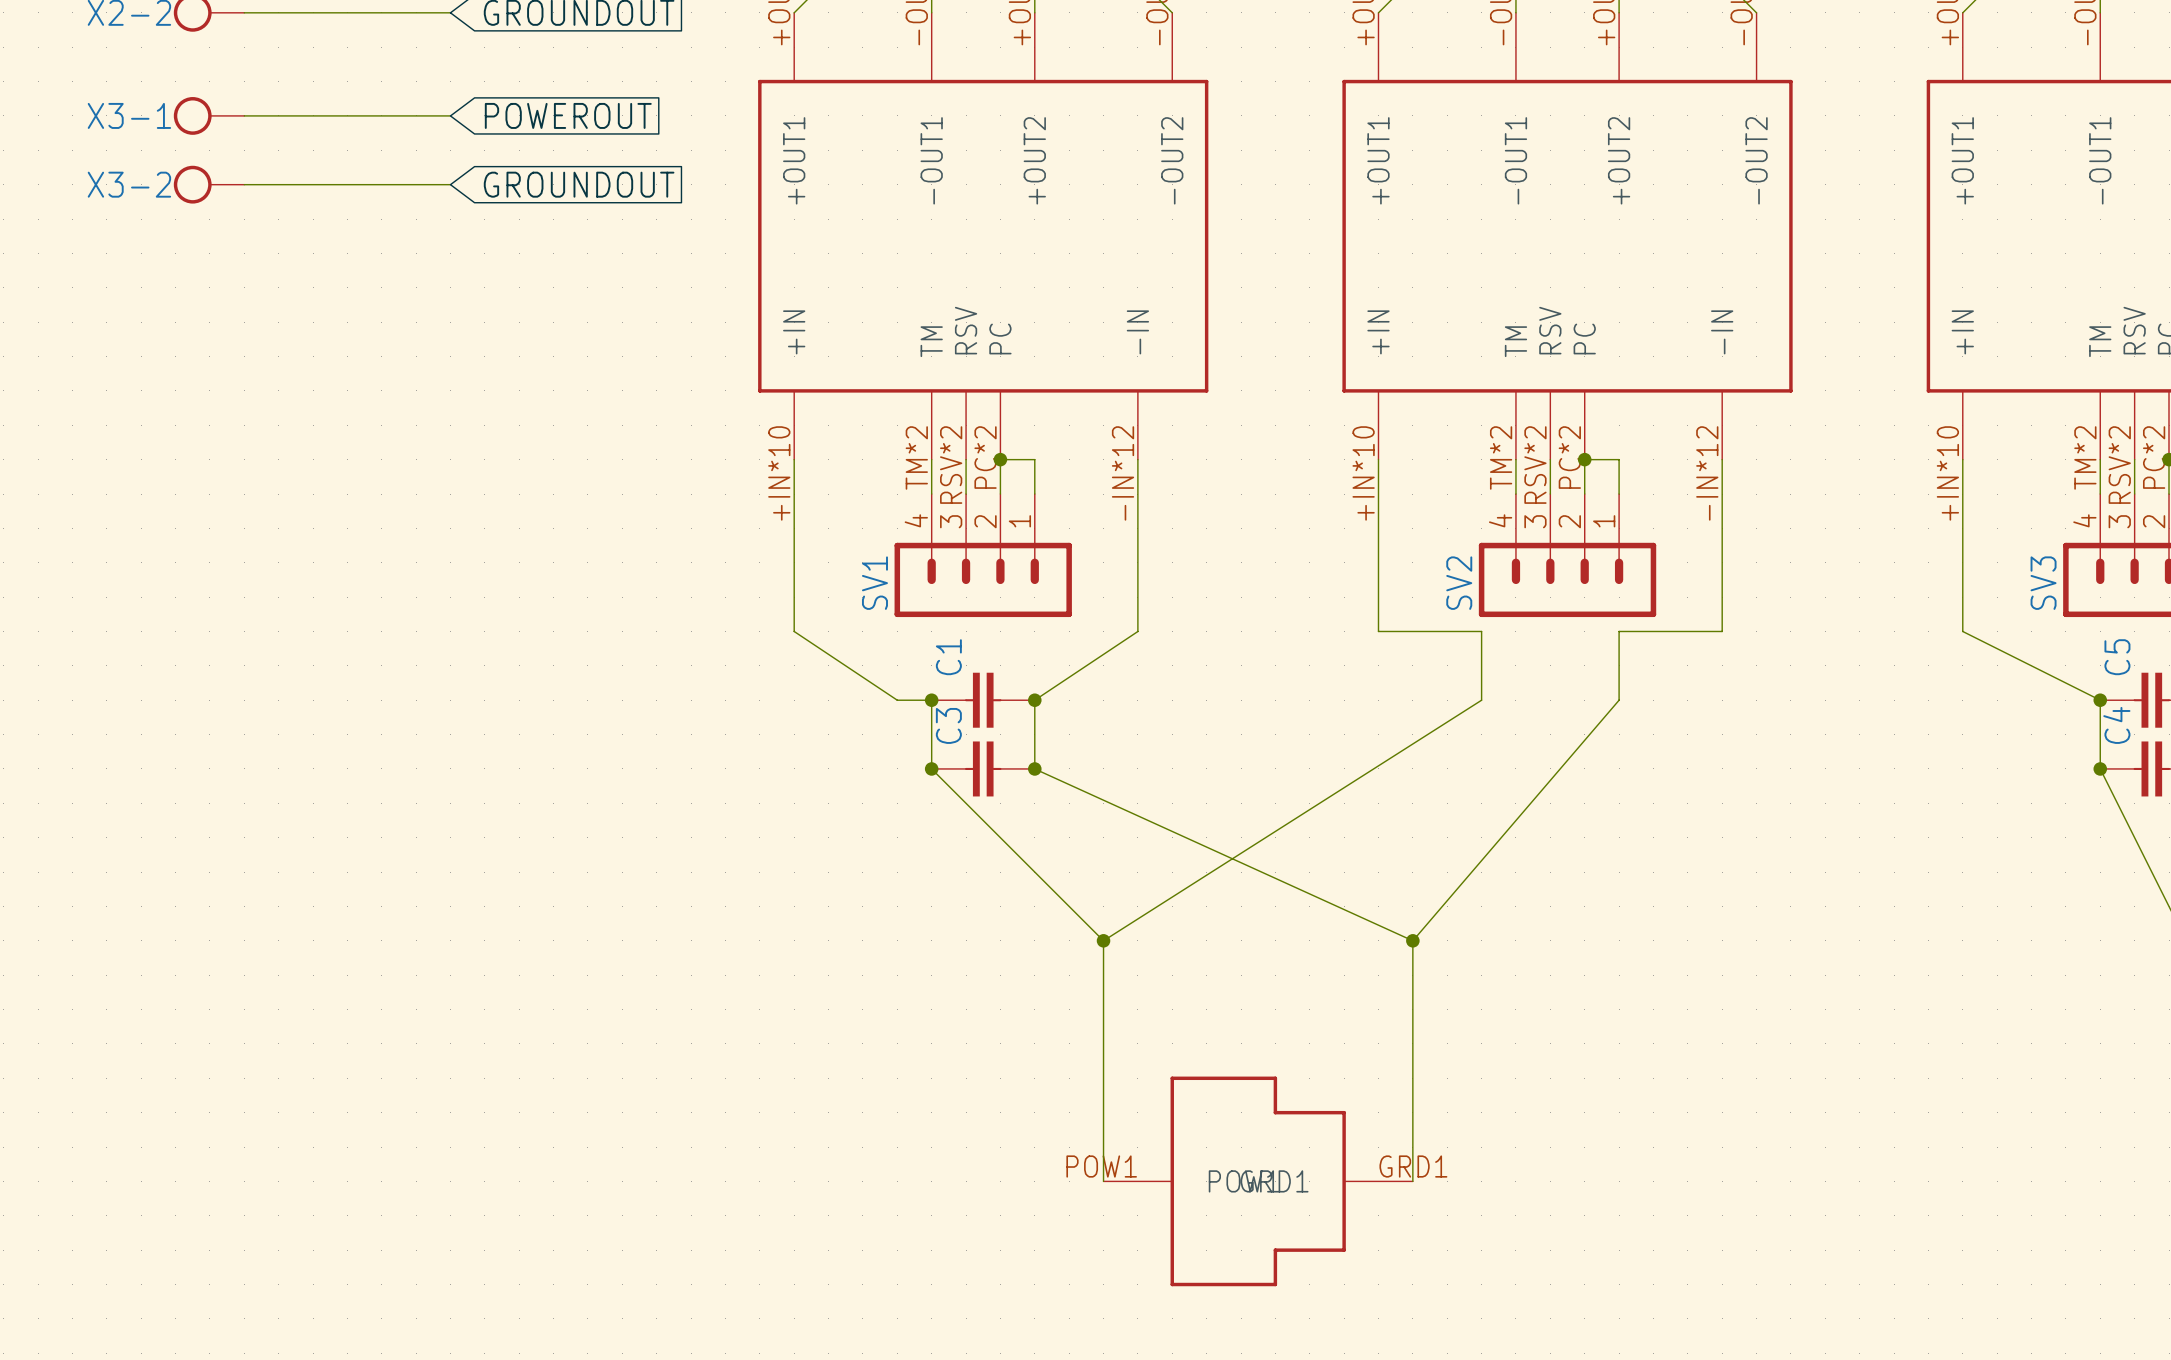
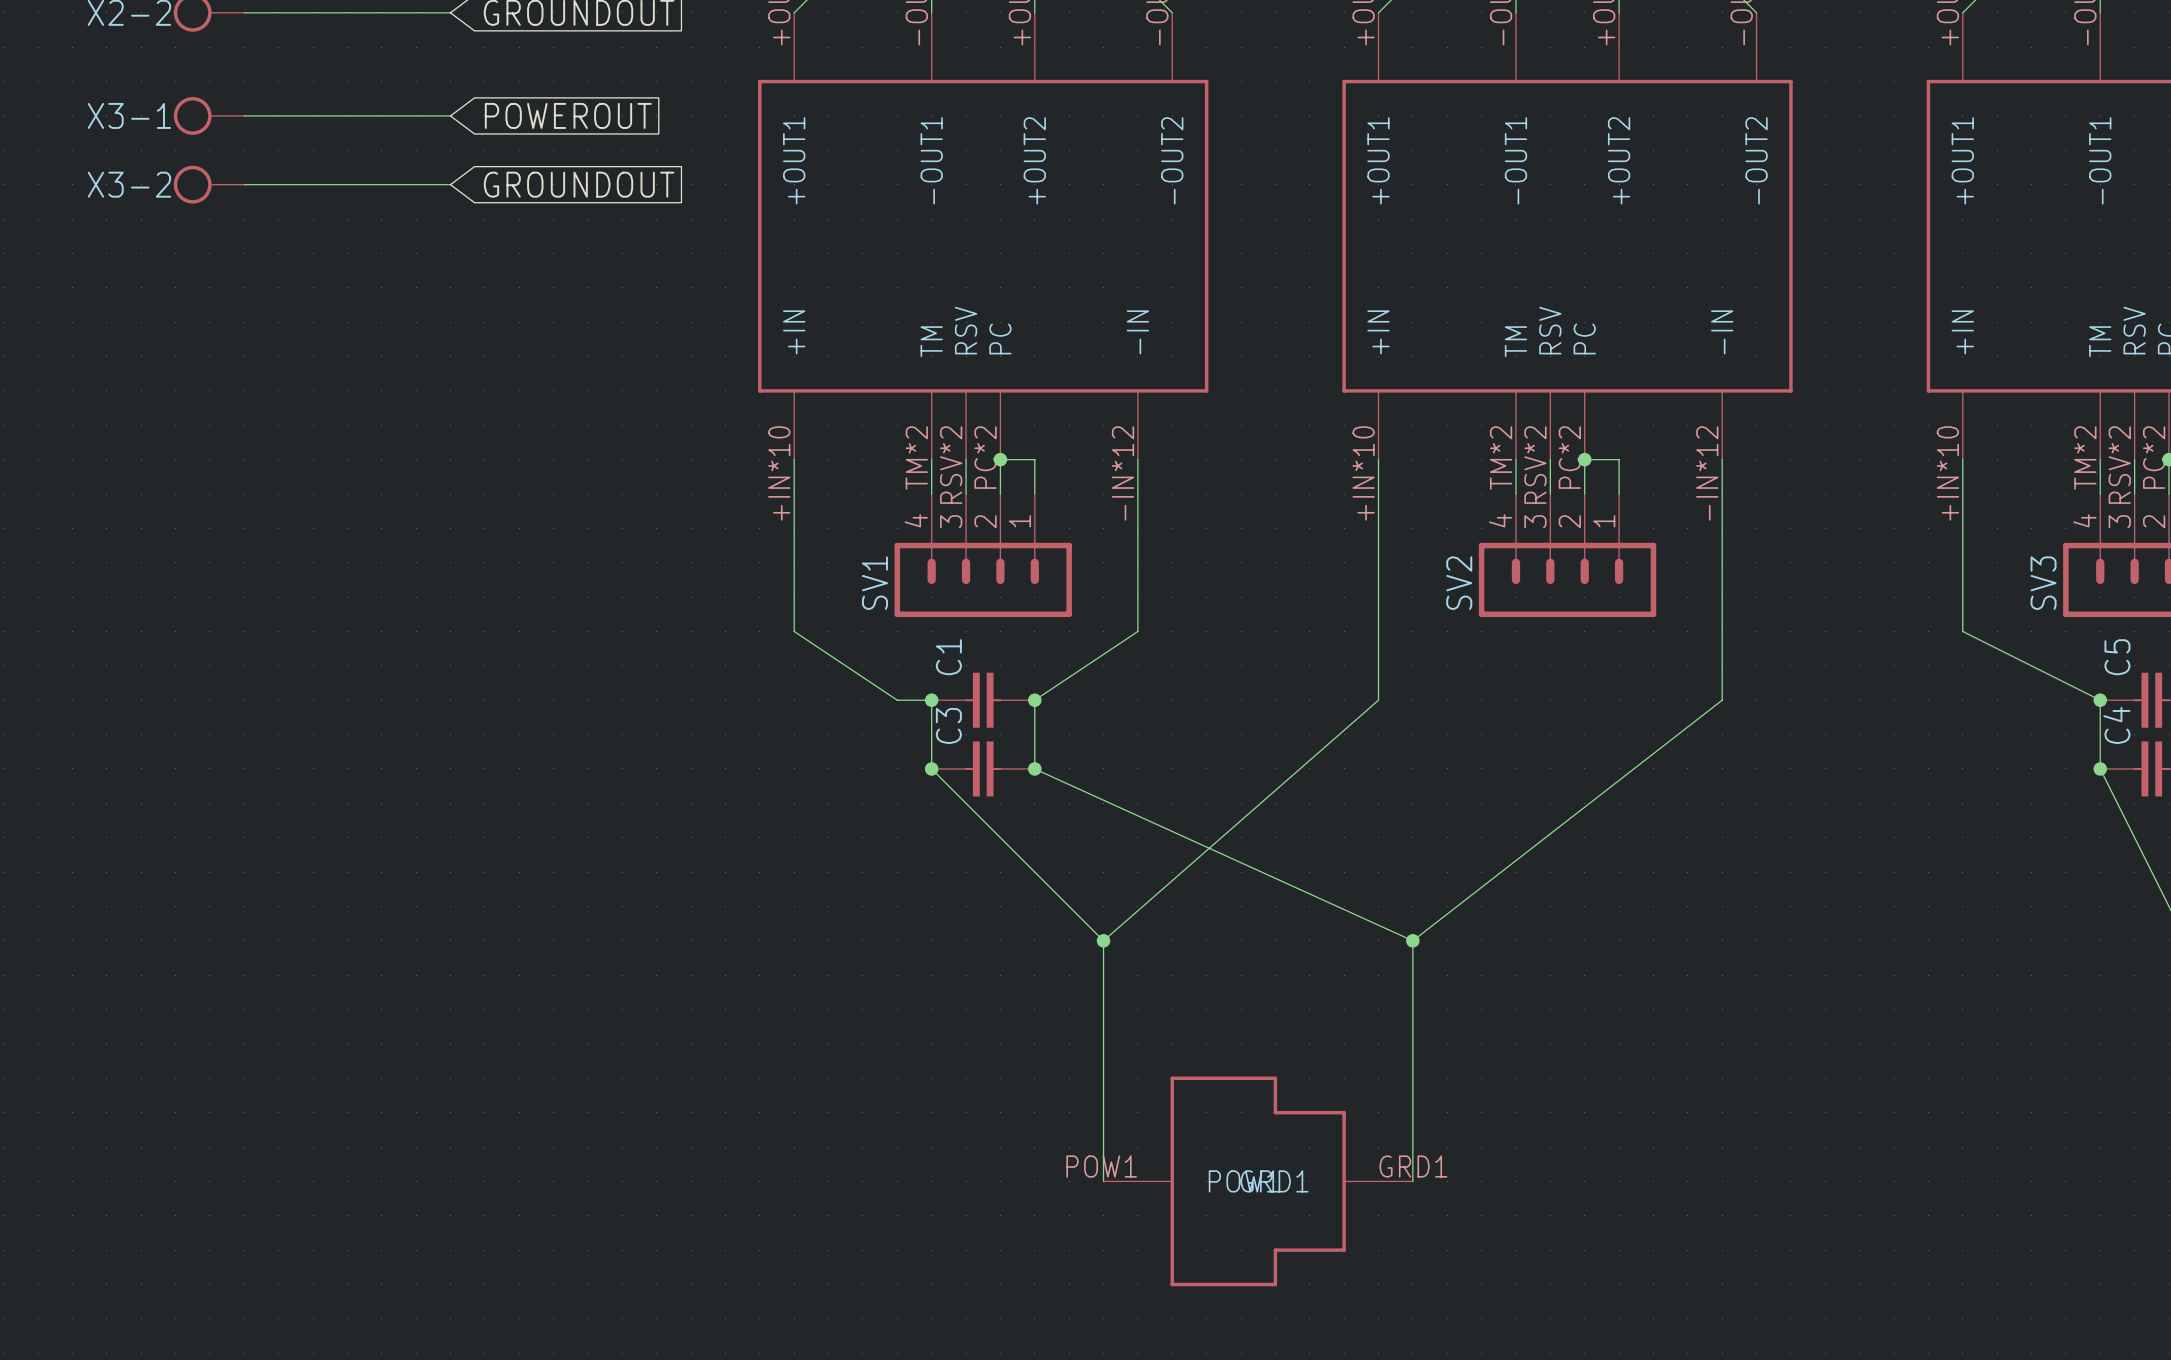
wire: (1378, 631) (1481, 631) (1481, 700) (1103, 940) -> (1378, 631) (1378, 700) (1103, 940)
wire: (1722, 631) (1619, 631) (1619, 700) (1412, 940) -> (1722, 631) (1722, 700) (1412, 940)

